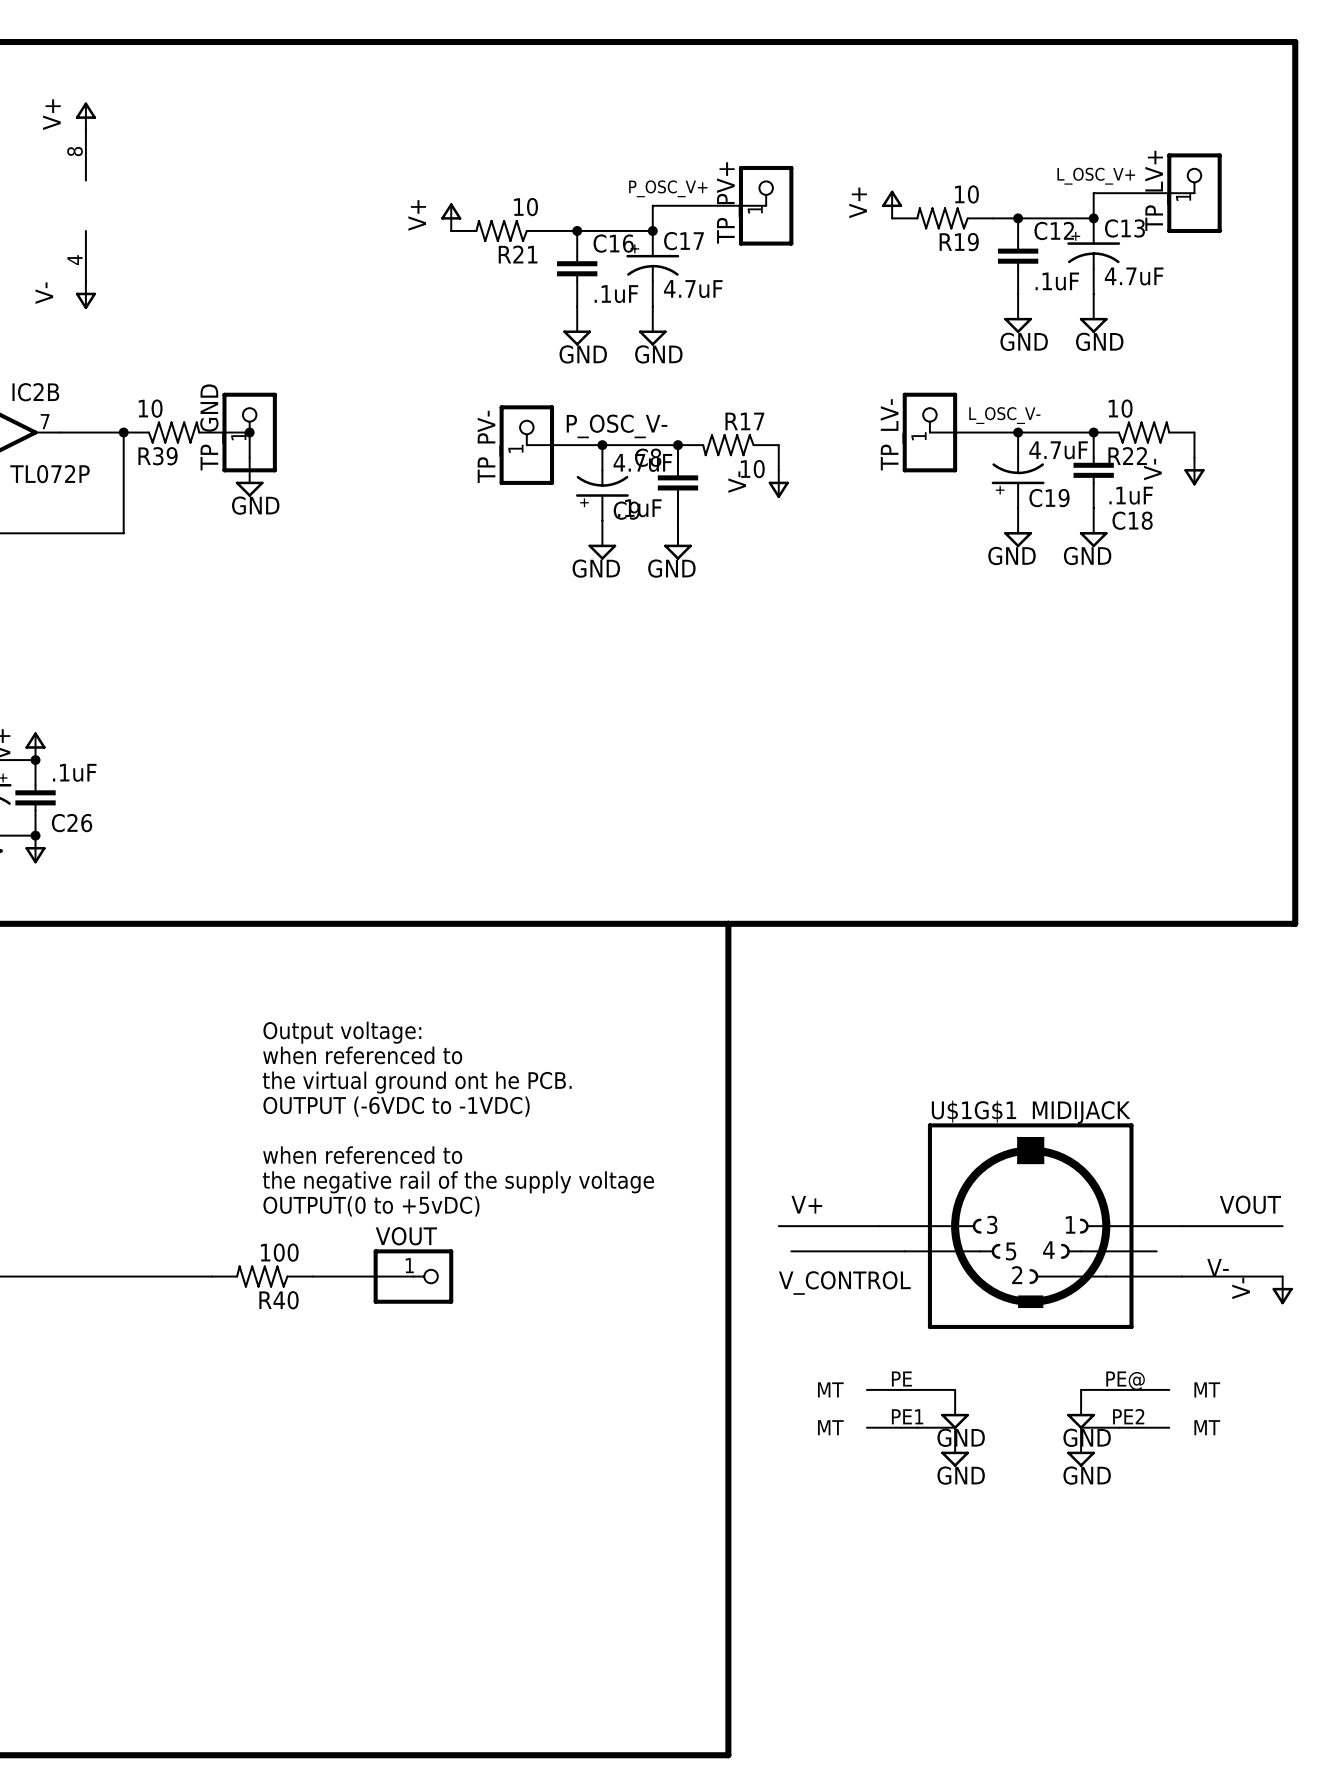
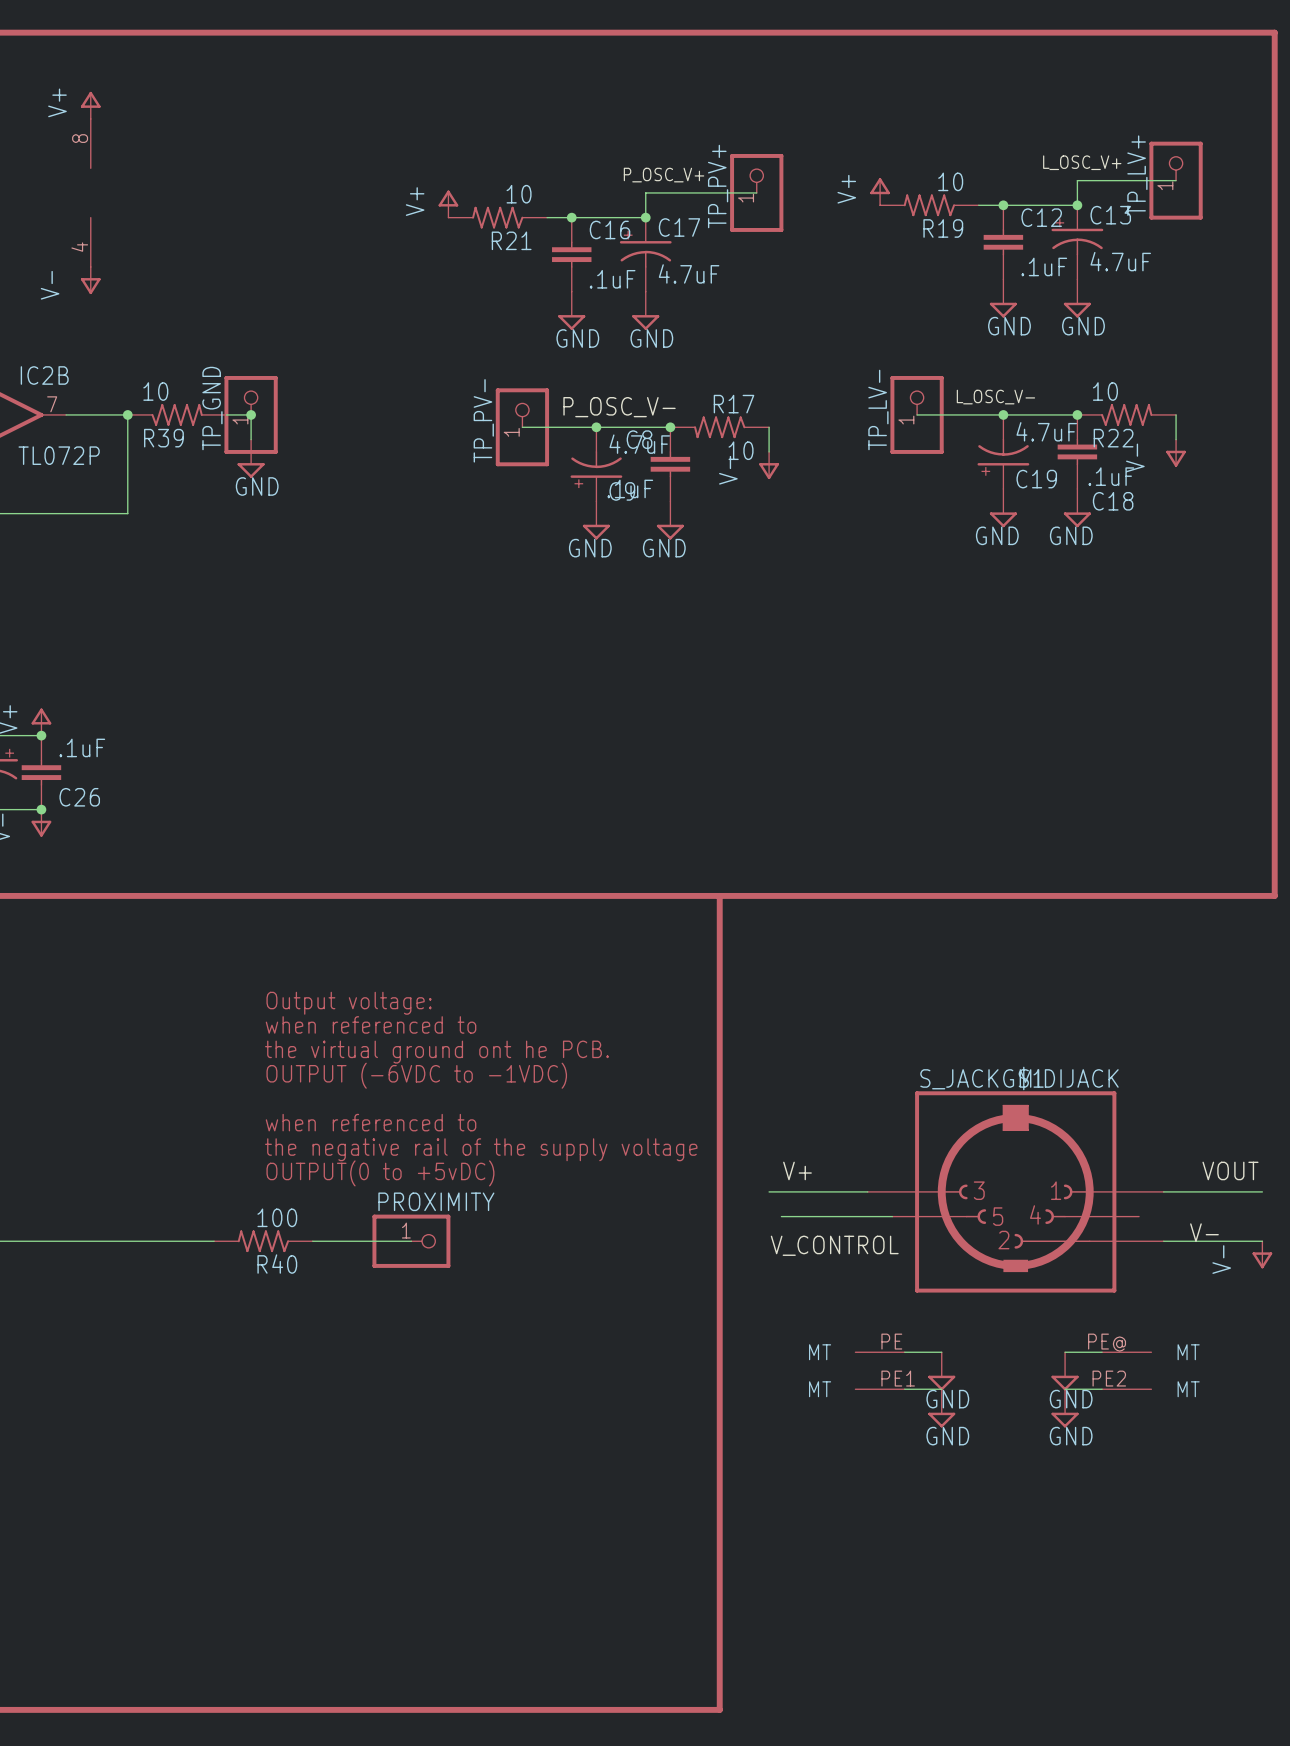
U$1G$1 name: U$1G$1 (973, 1111) -> S_JACKG$1 (981, 1078)
VOUT name: VOUT (406, 1236) -> PROXIMITY (436, 1201)

